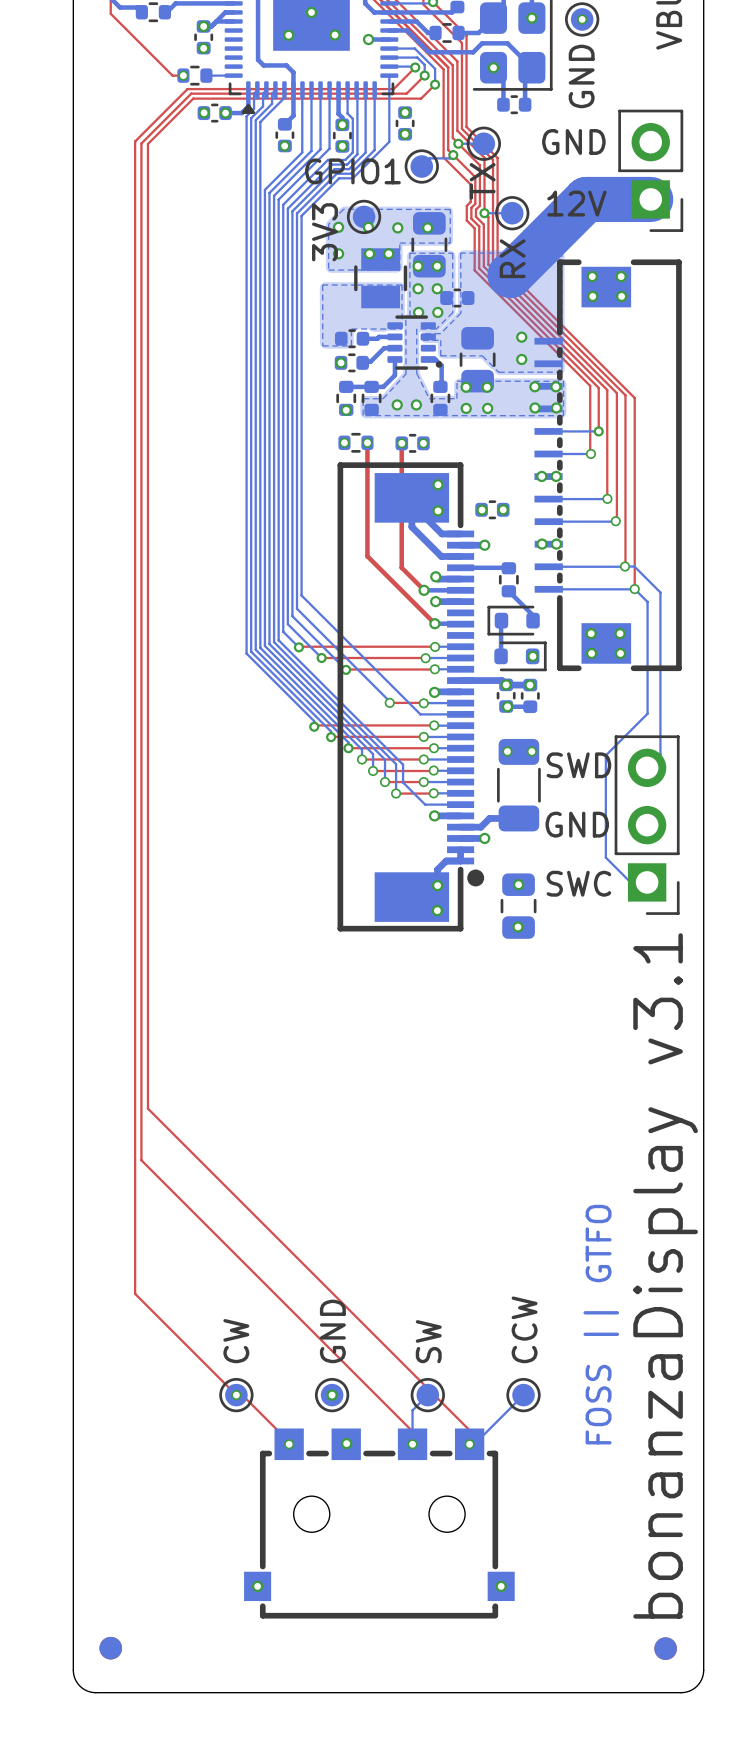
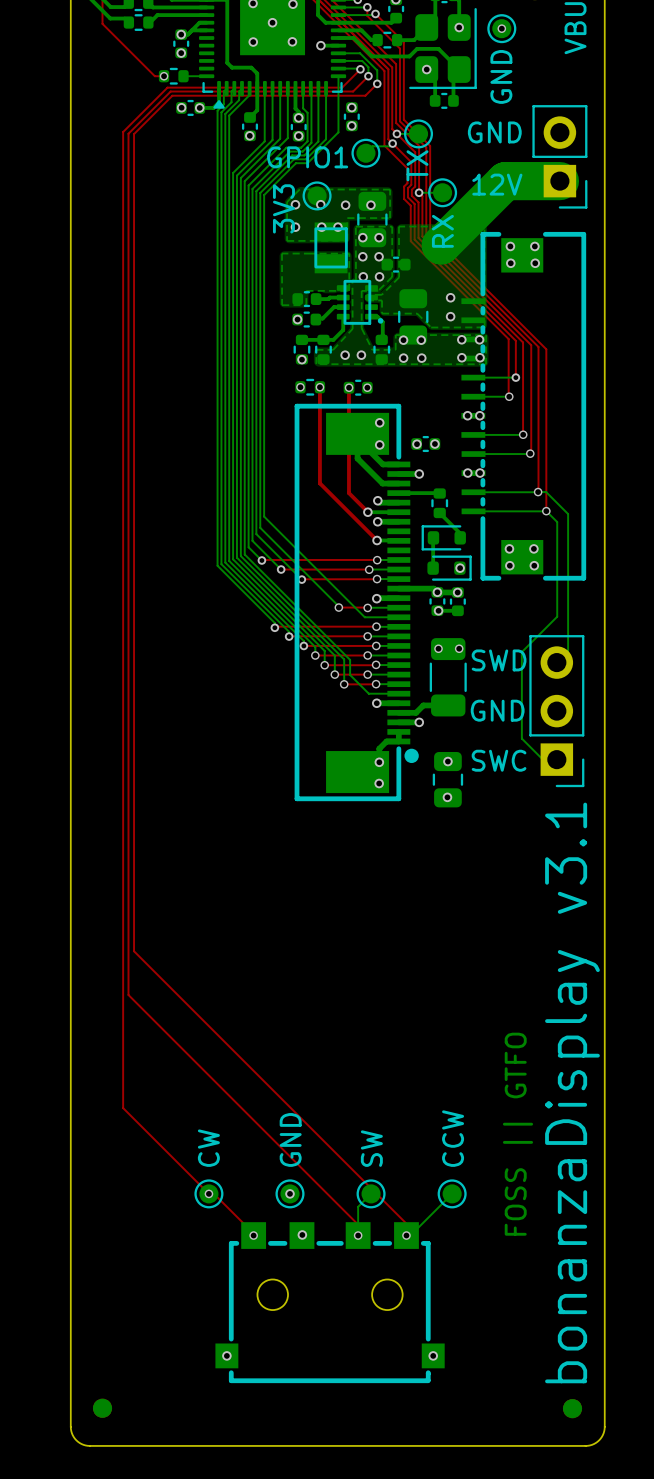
part footprint: [354, 248, 408, 309] -> [314, 222, 348, 274]
part footprint: [387, 315, 443, 370] -> [336, 279, 384, 325]

